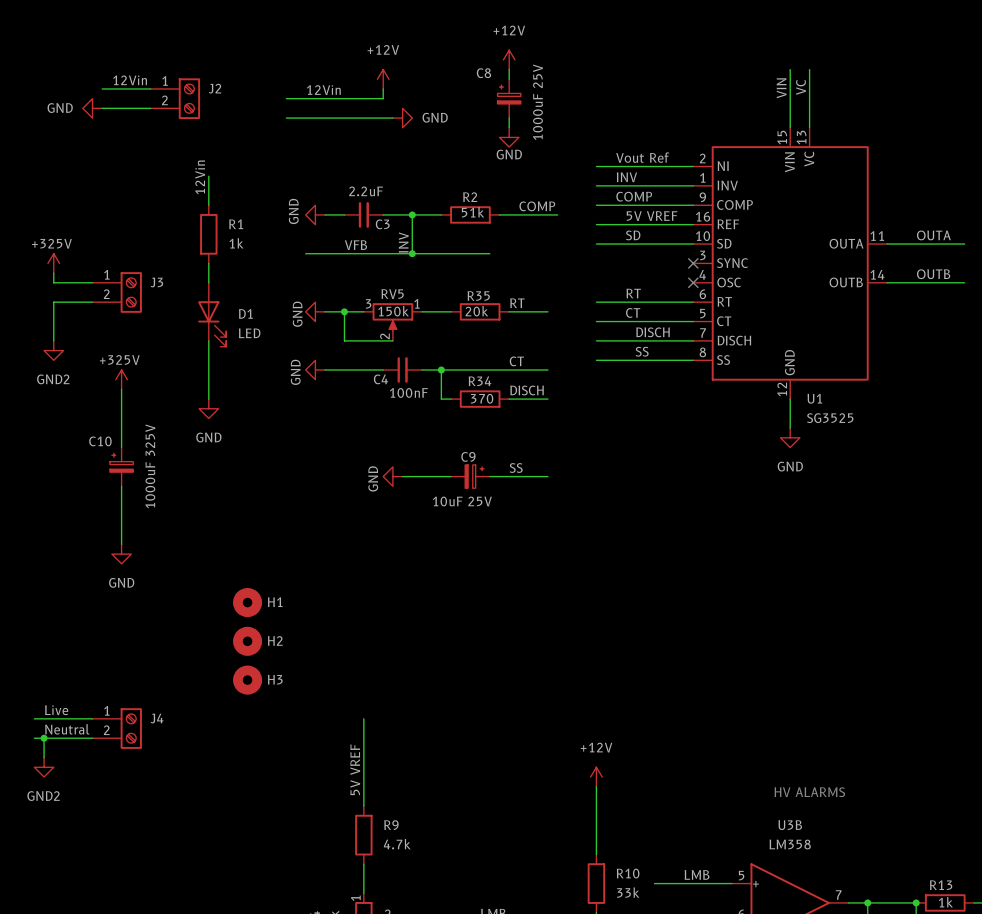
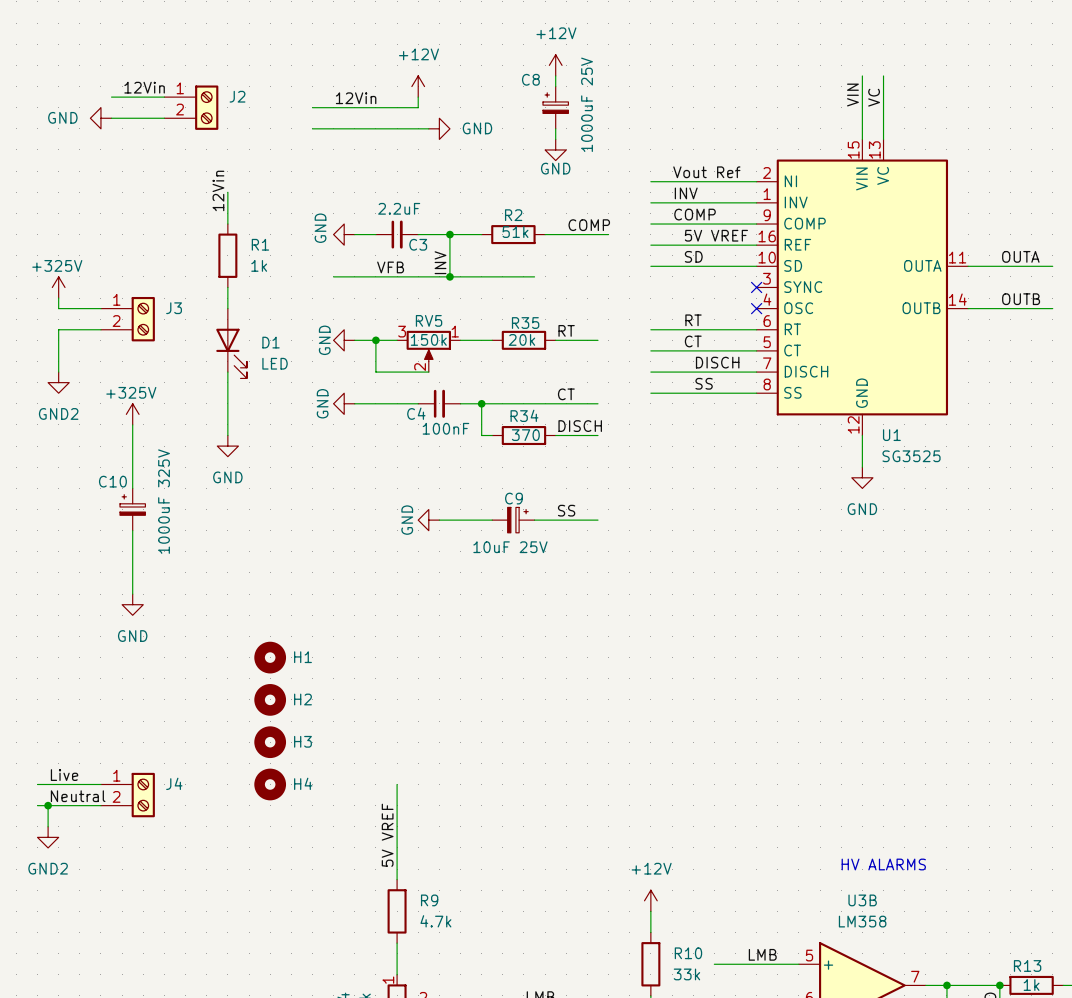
H4: none -> (270, 784)
power symbol position: +12V (596, 776) -> +12V (650, 900)
wire: (596, 786) (596, 835) -> none

